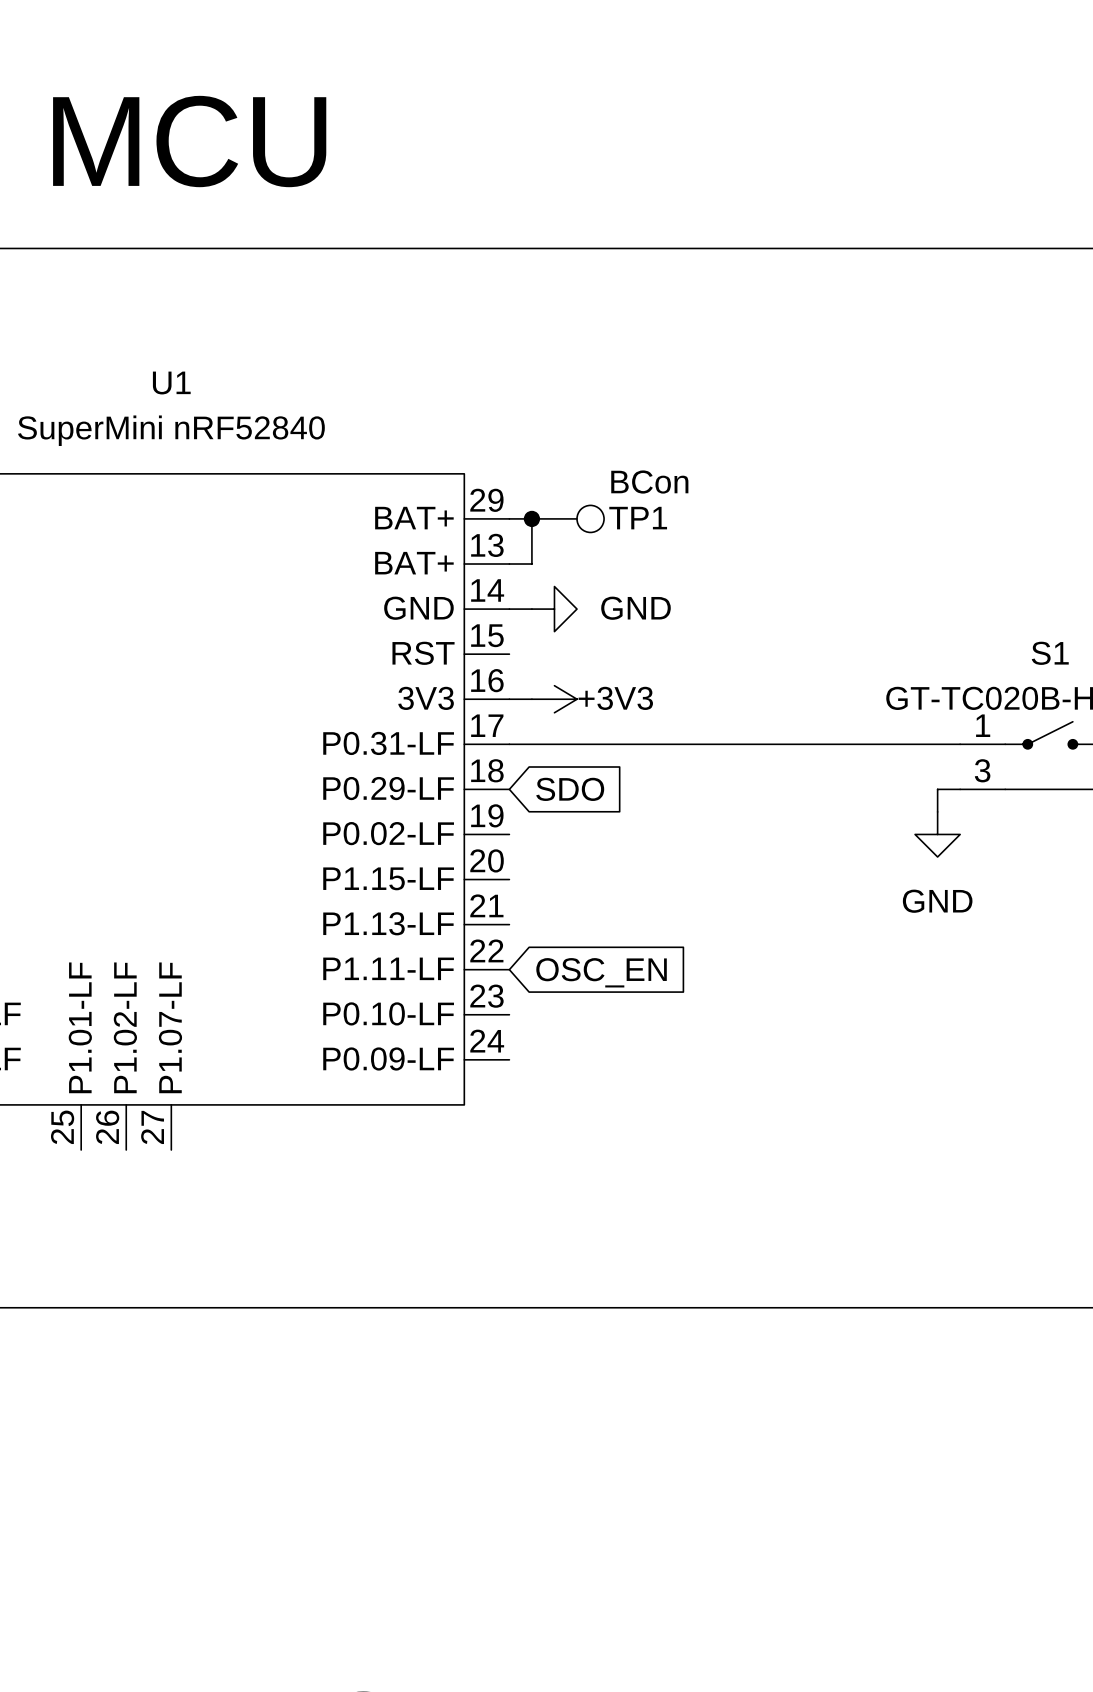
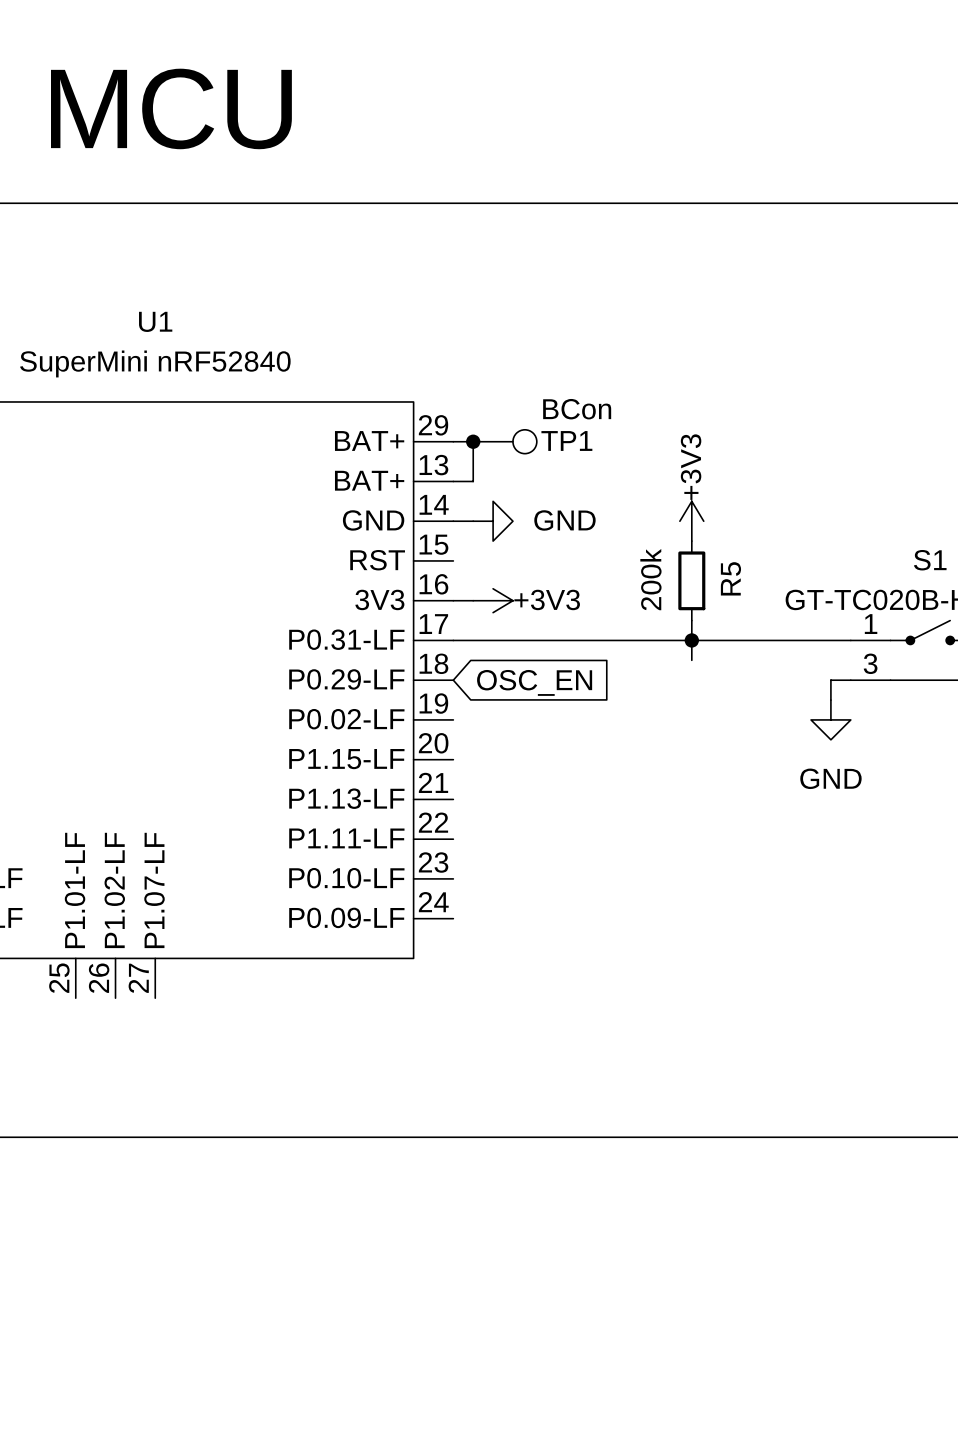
power symbol: none -> +3V3 (691, 521)
R5: none -> 200k (691, 580)
wire: none -> (691, 620) (691, 660)
junction: none -> (691, 640)
global label: SDO (570, 789) -> OSC_EN (534, 682)
global label: OSC_EN (601, 972) -> none

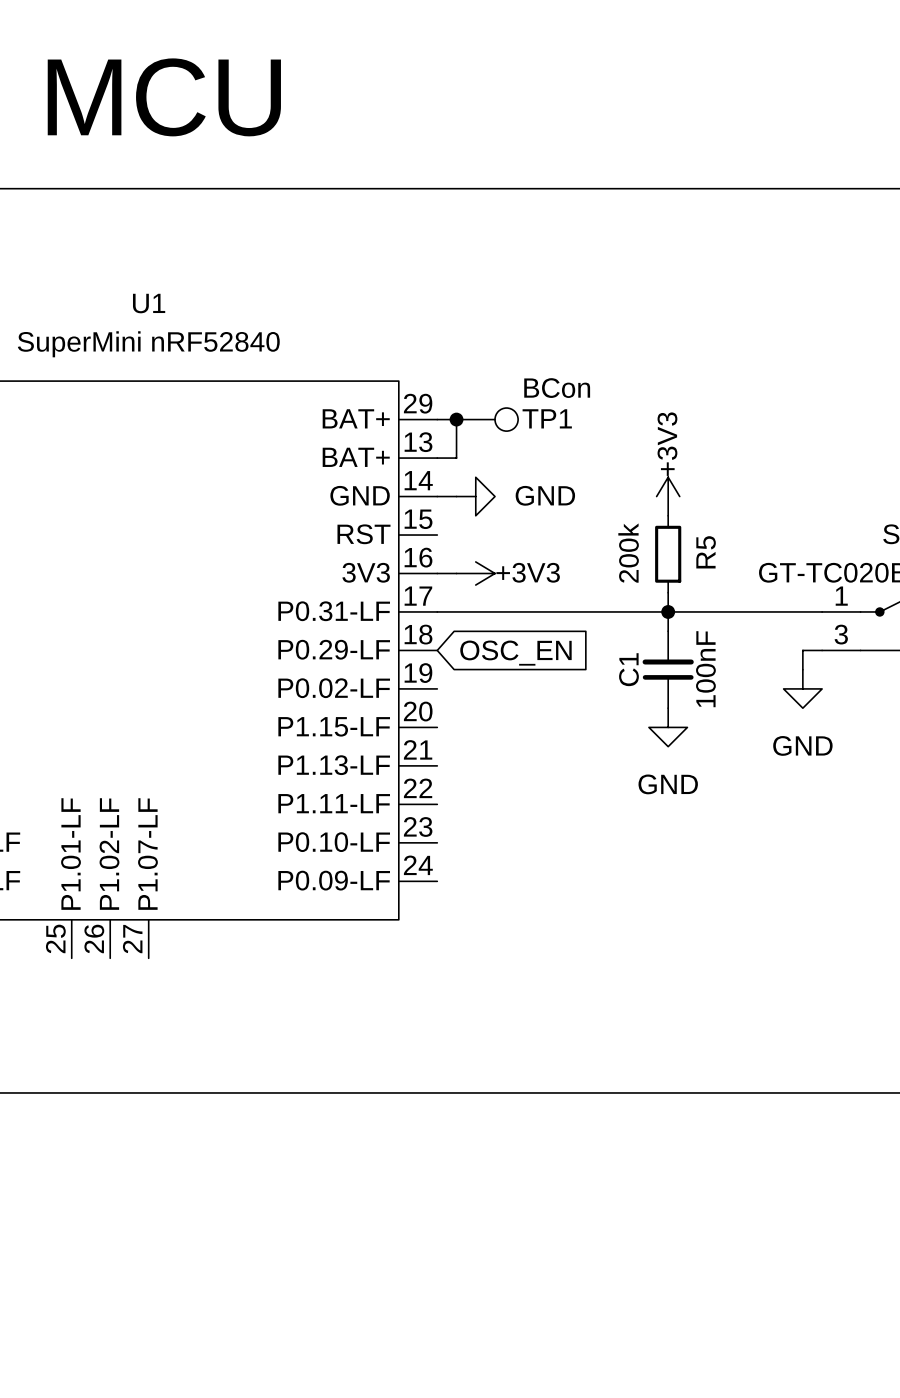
C1: none -> 100nF (668, 669)
power symbol: none -> GND (668, 727)

